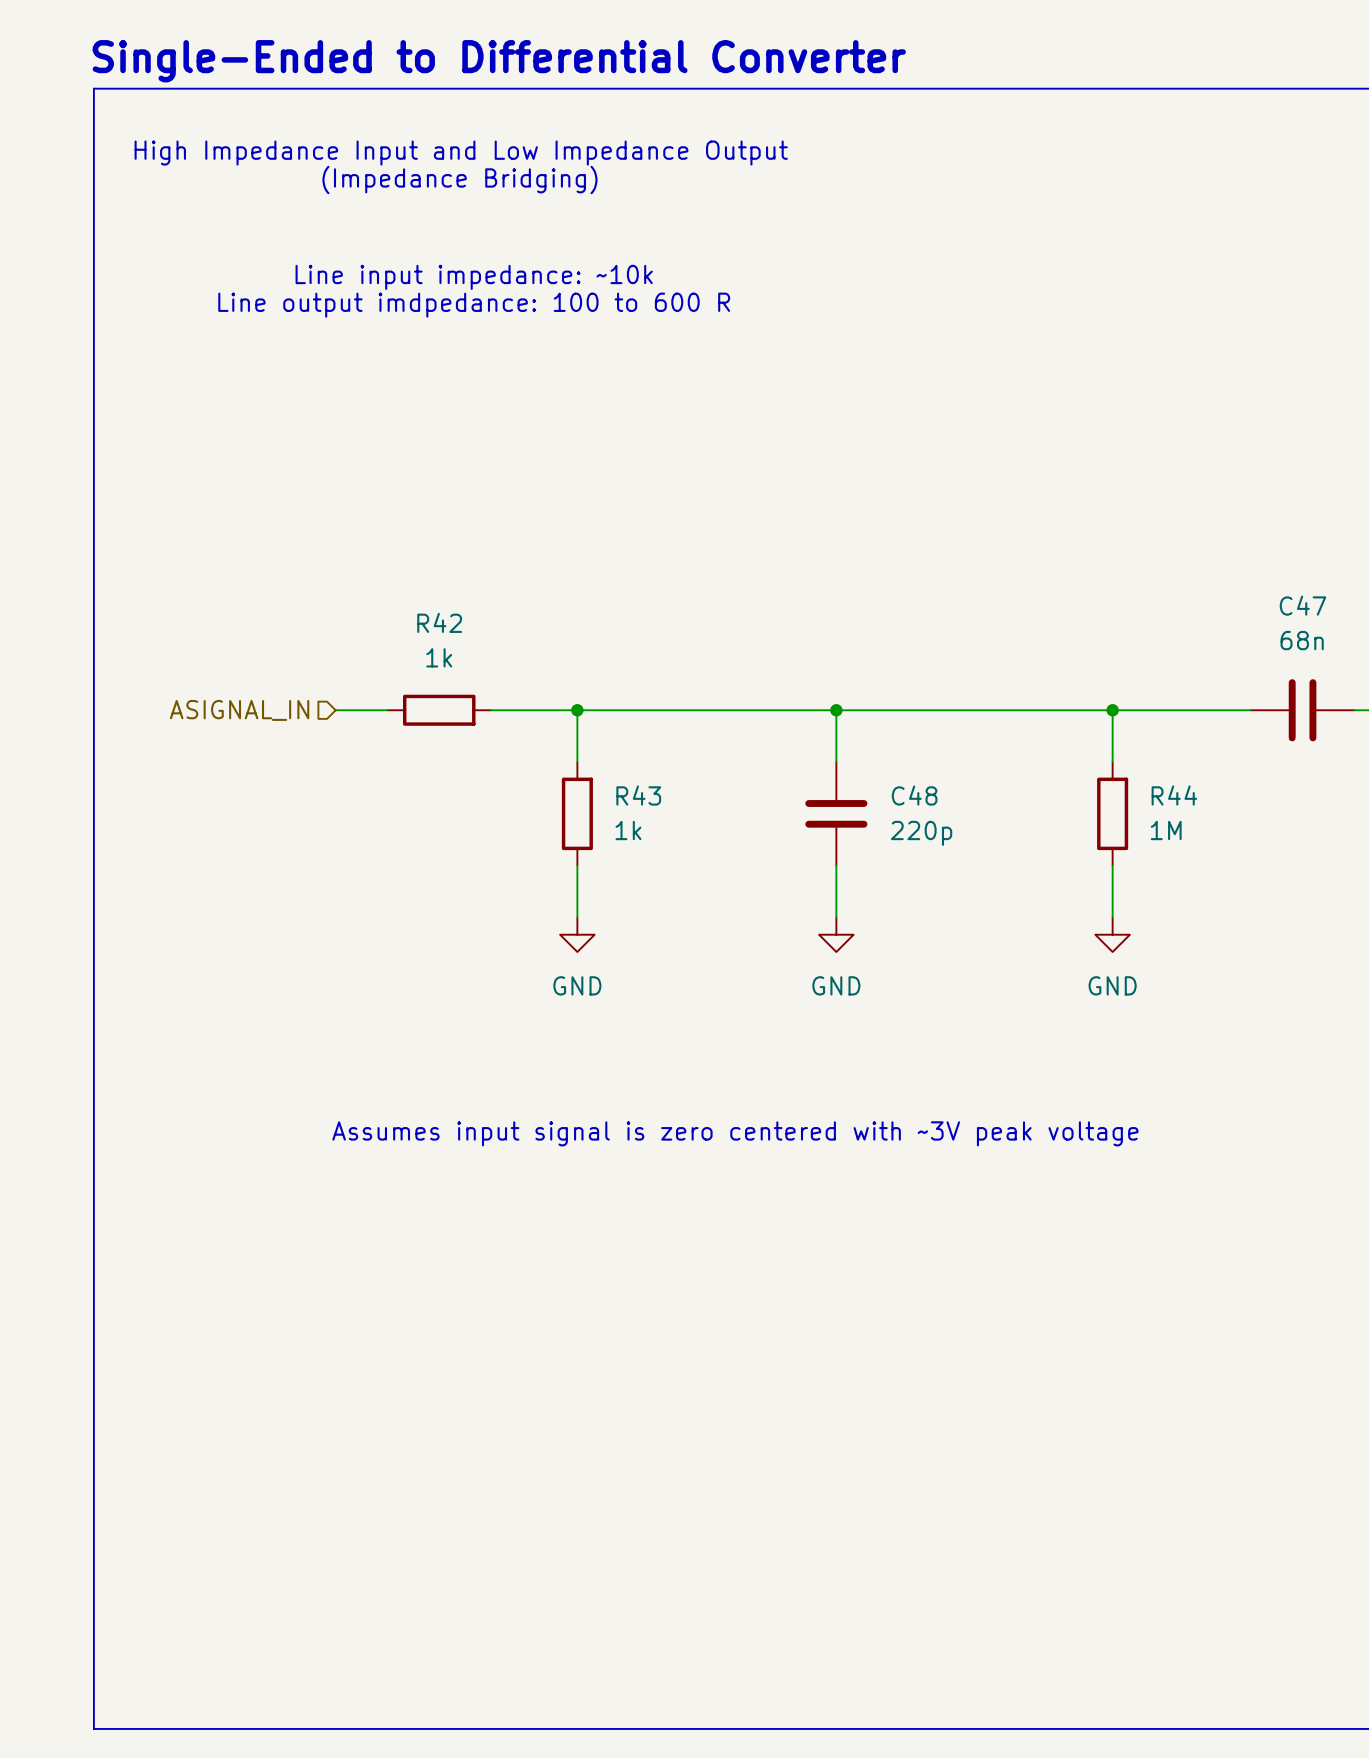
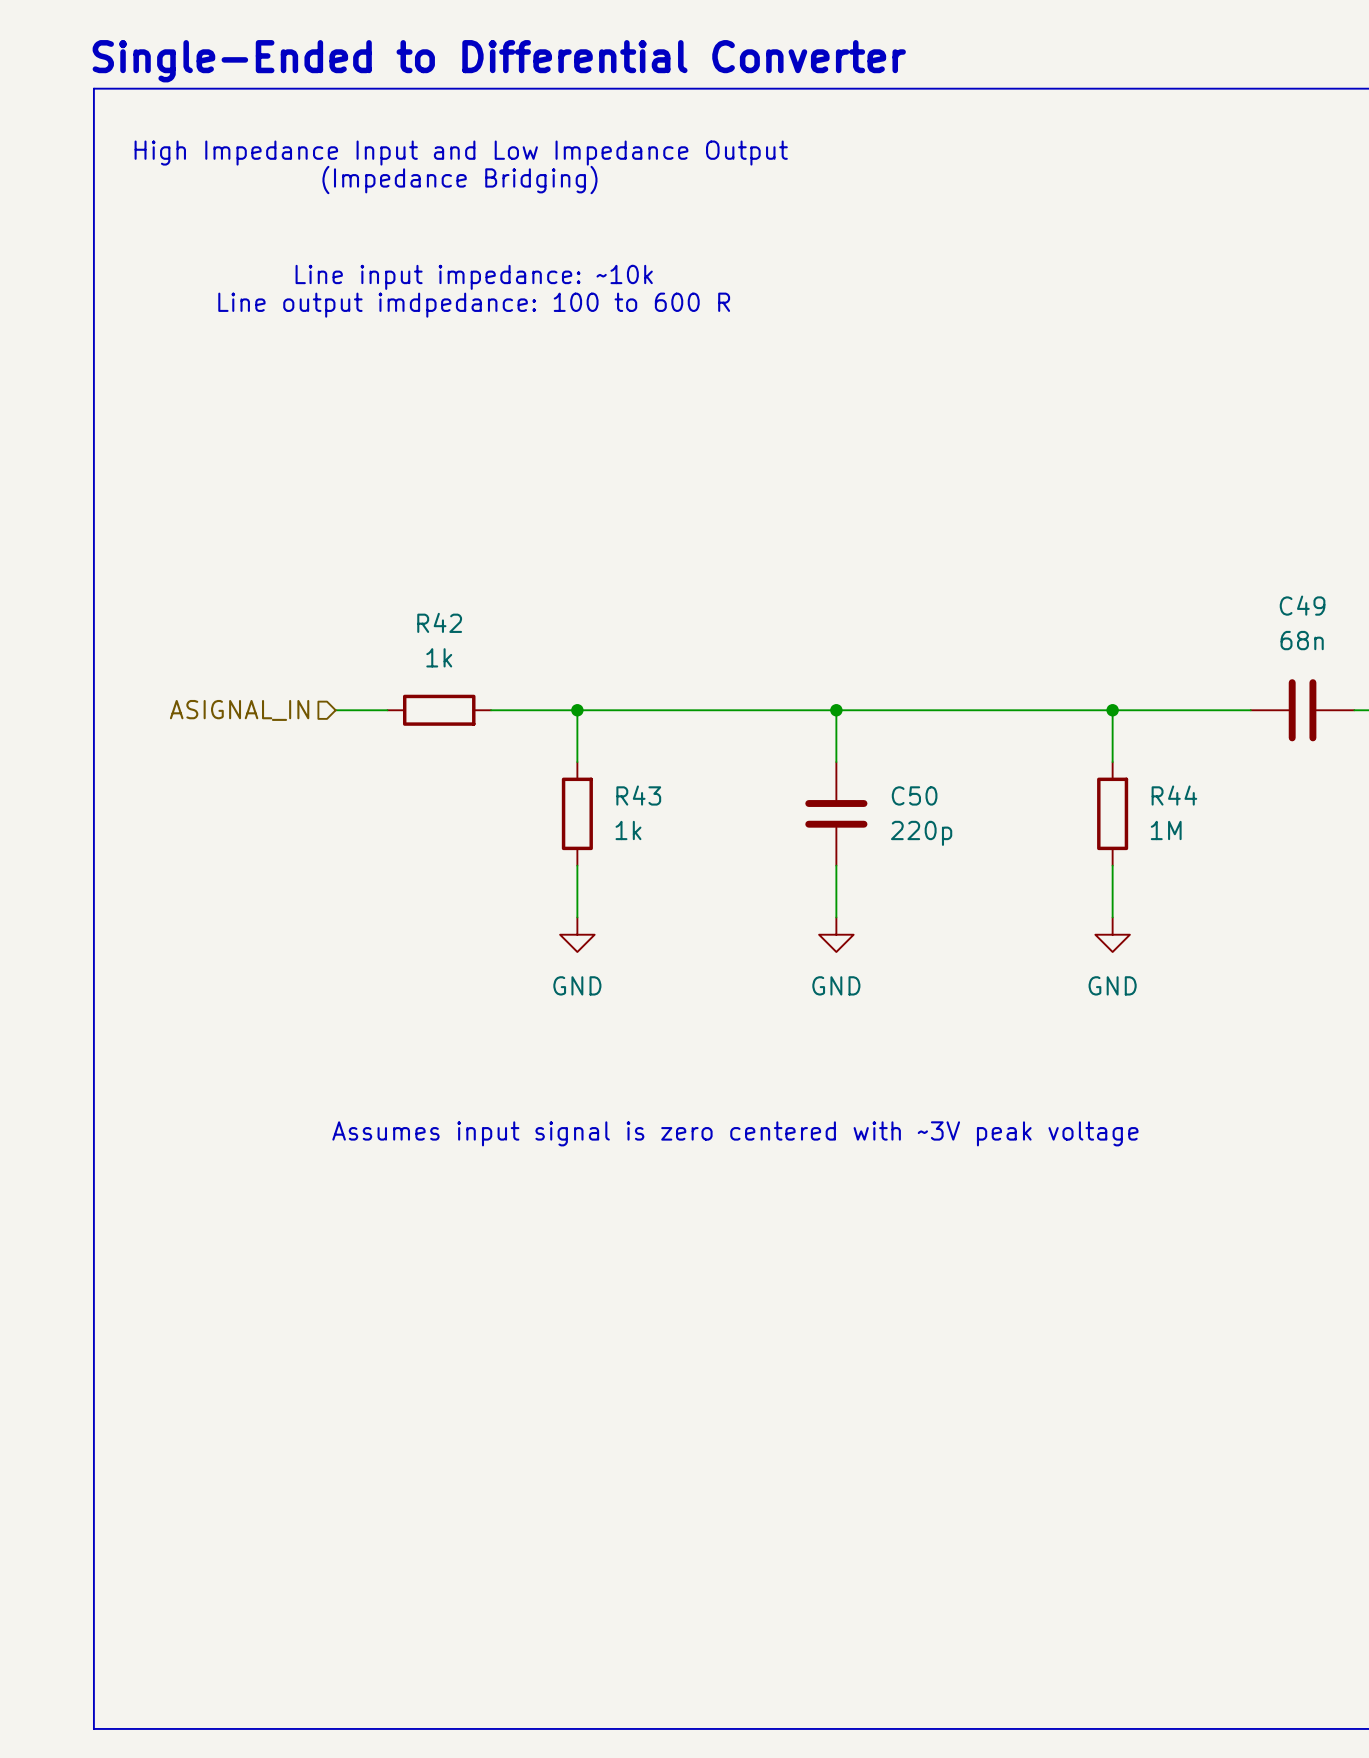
C47 name: C47 (1302, 605) -> C49 (1302, 605)
C48 name: C48 (914, 795) -> C50 (914, 795)

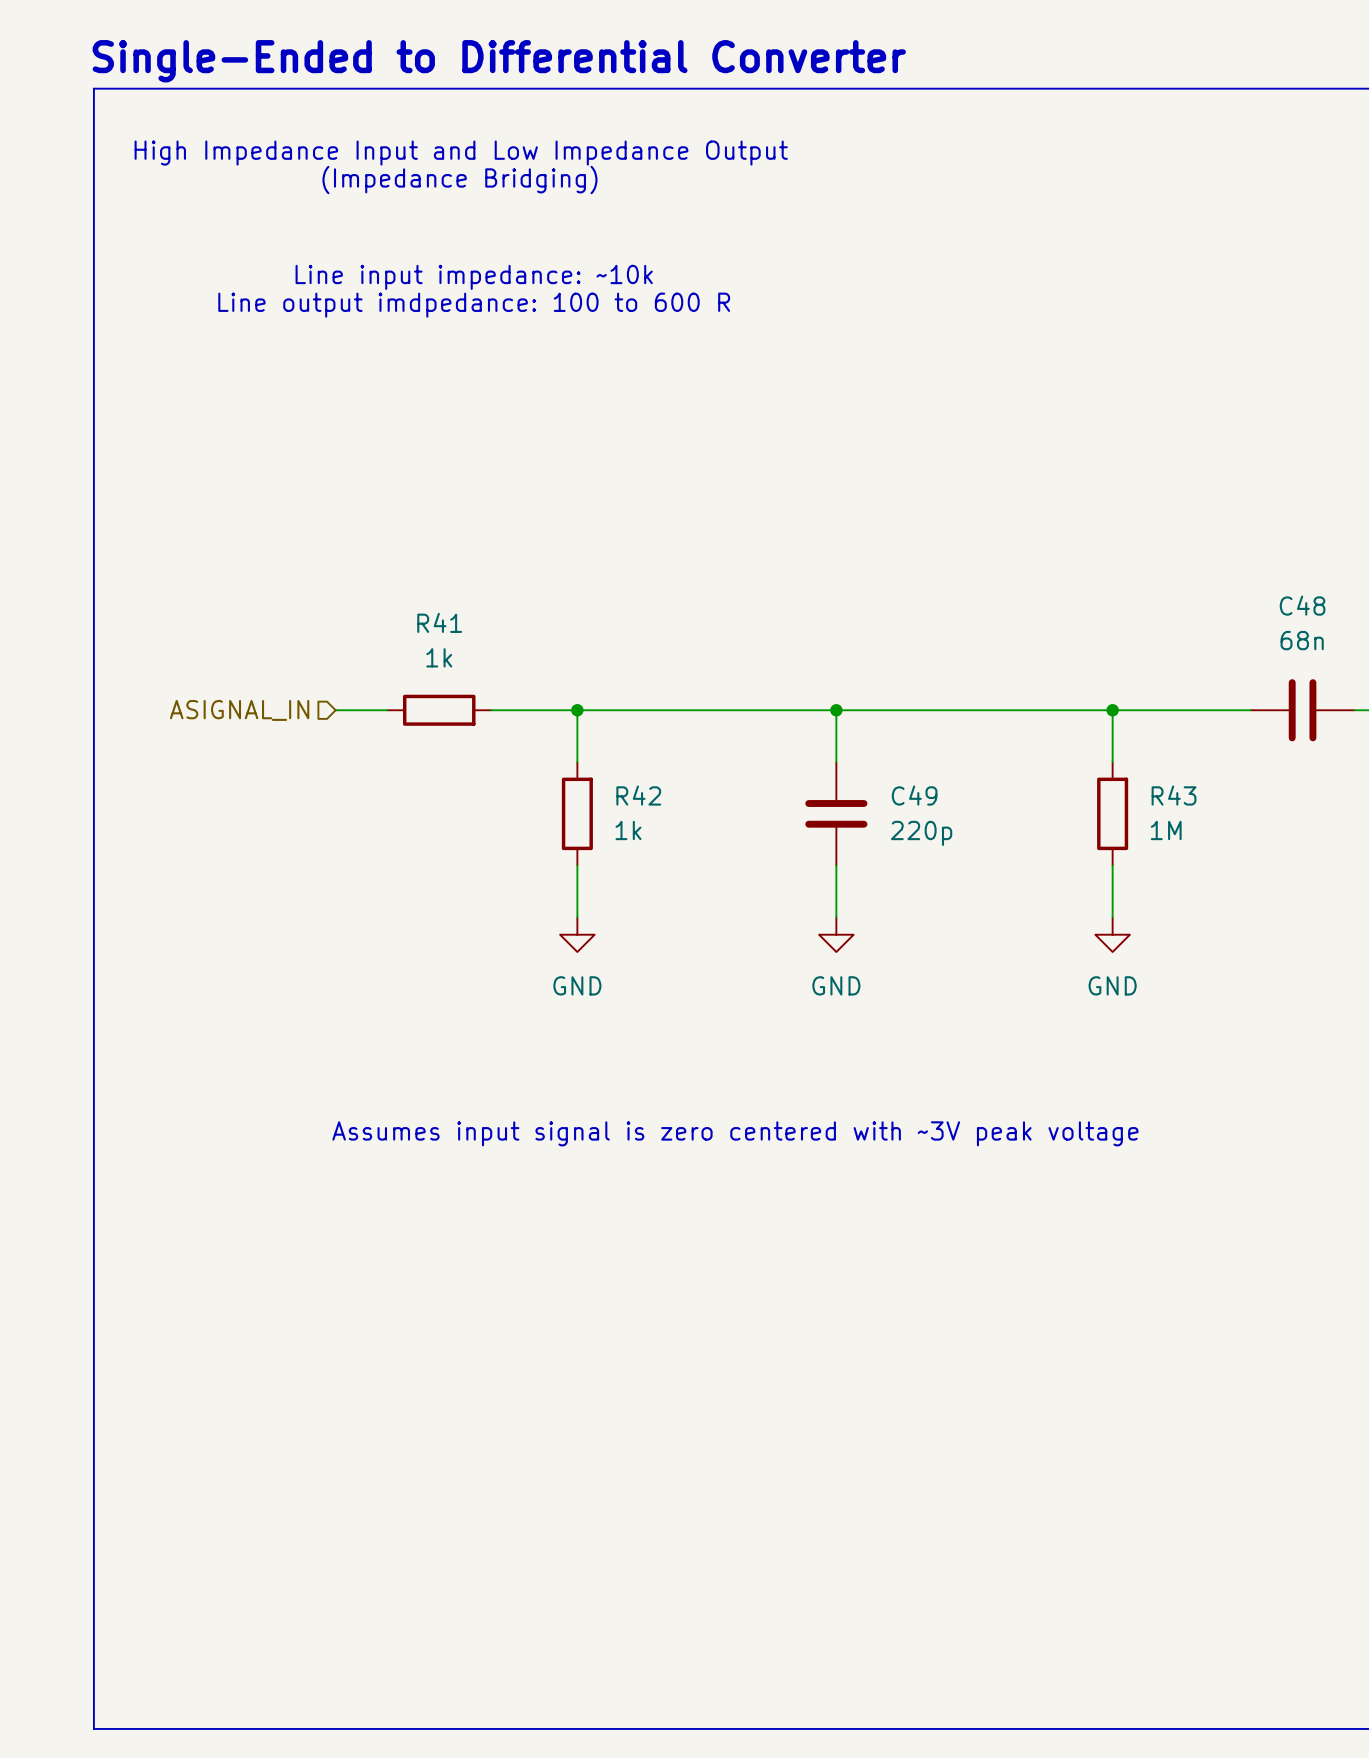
C49 name: C49 (1302, 605) -> C48 (1302, 605)
R42 name: R42 (439, 622) -> R41 (439, 622)
R43 name: R43 (638, 795) -> R42 (638, 795)
C50 name: C50 (914, 795) -> C49 (914, 795)
R44 name: R44 (1174, 795) -> R43 (1174, 795)

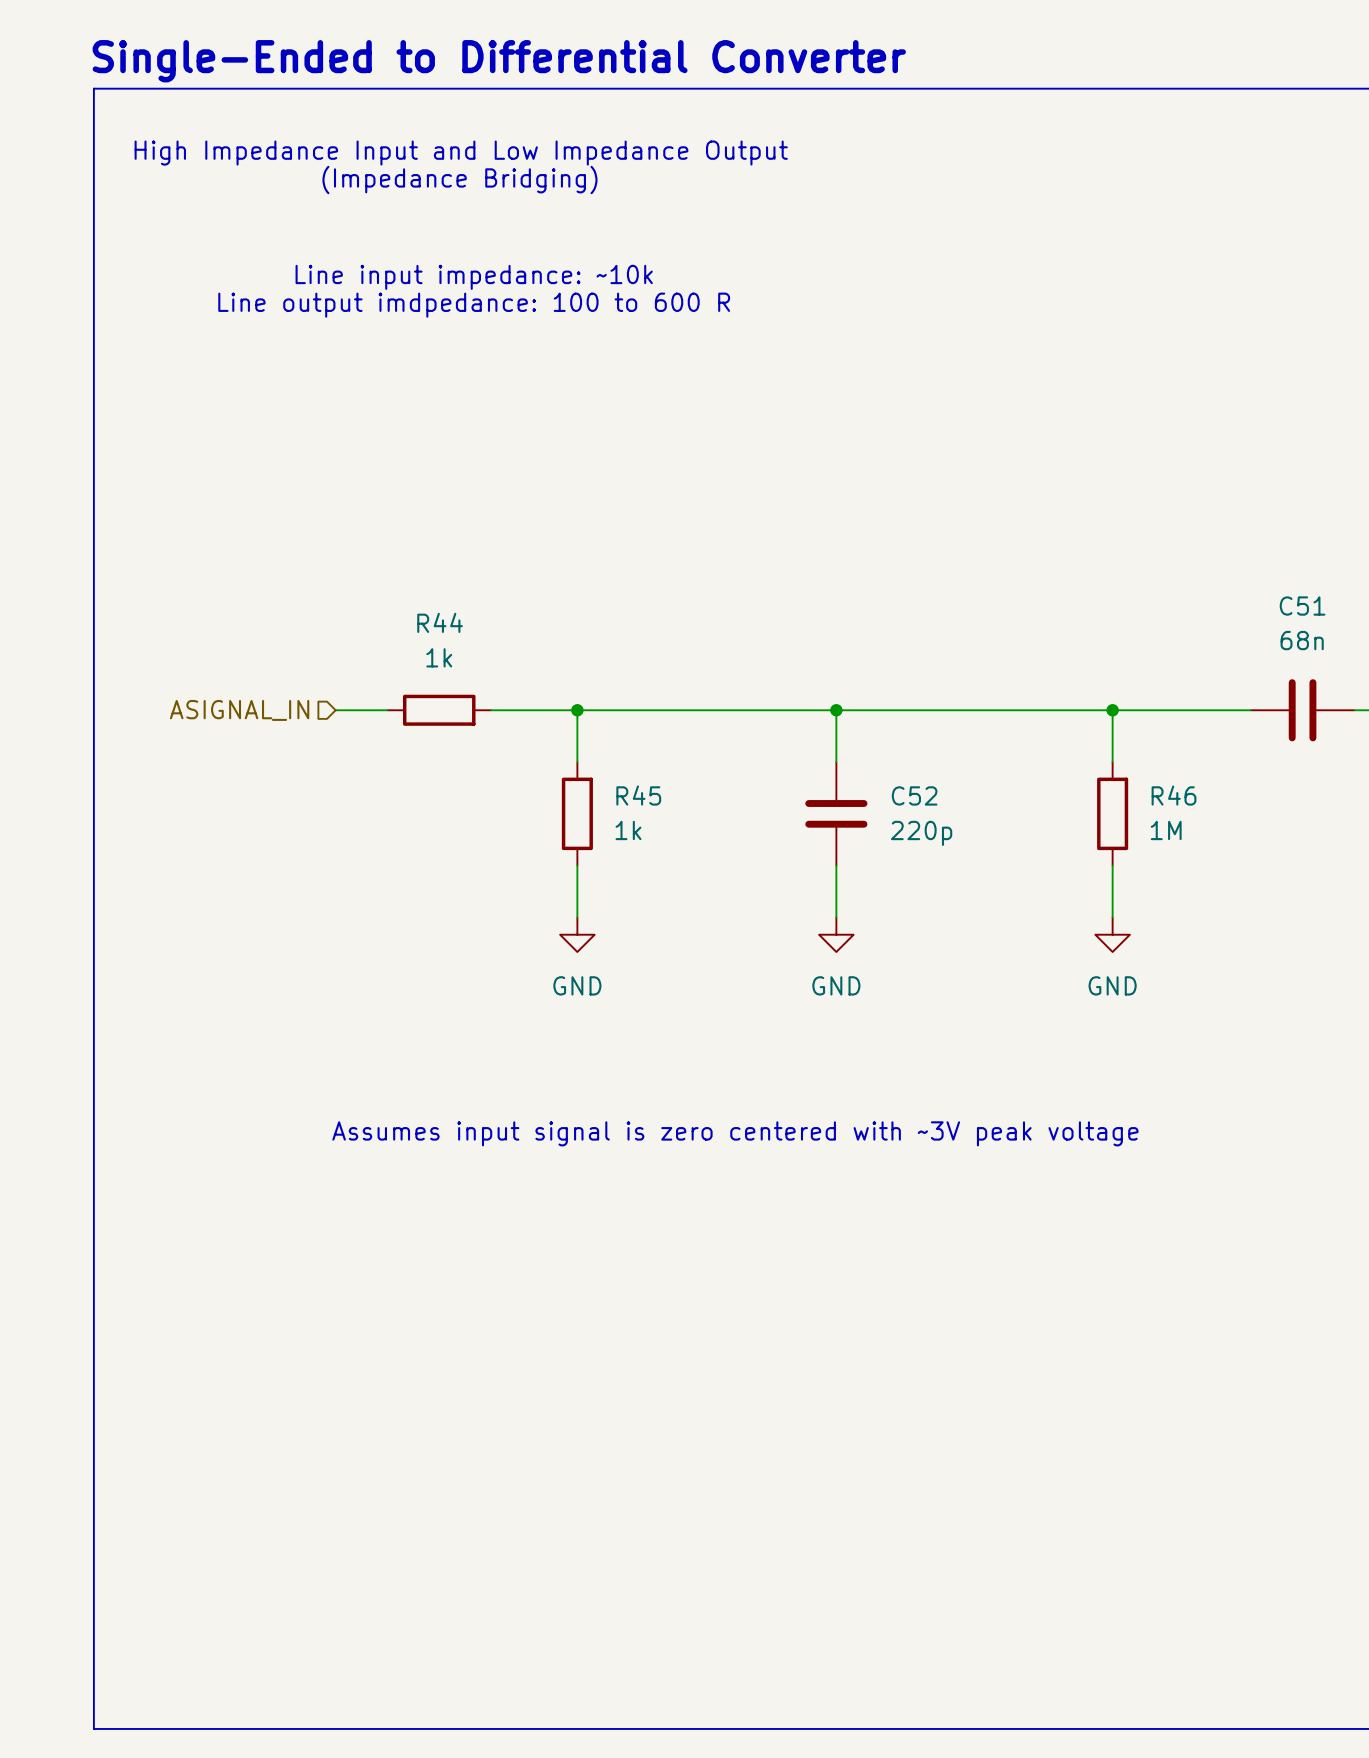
C48 name: C48 (1302, 605) -> C51 (1302, 606)
R41 name: R41 (439, 622) -> R44 (440, 622)
R42 name: R42 (638, 795) -> R45 (638, 795)
C49 name: C49 (914, 795) -> C52 (914, 795)
R43 name: R43 (1174, 795) -> R46 (1174, 795)

